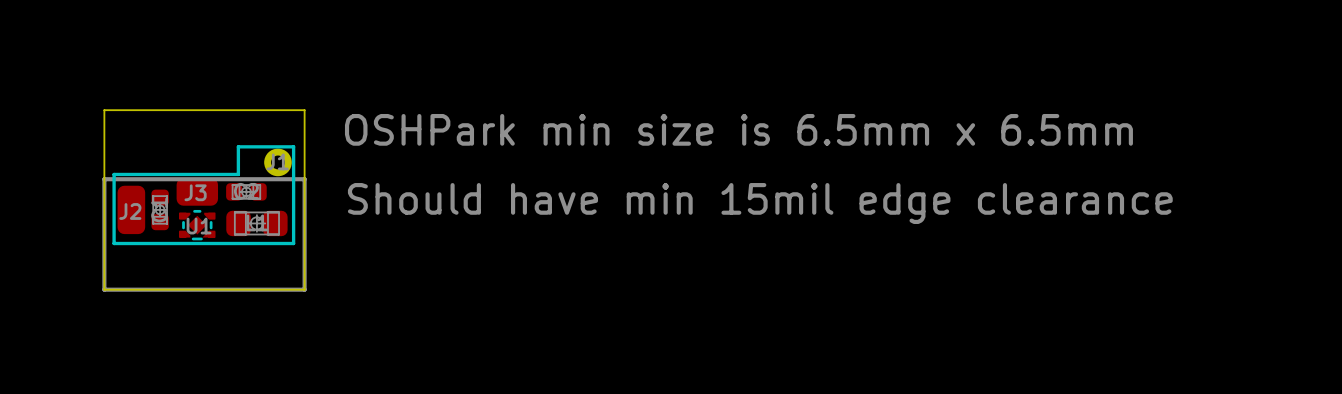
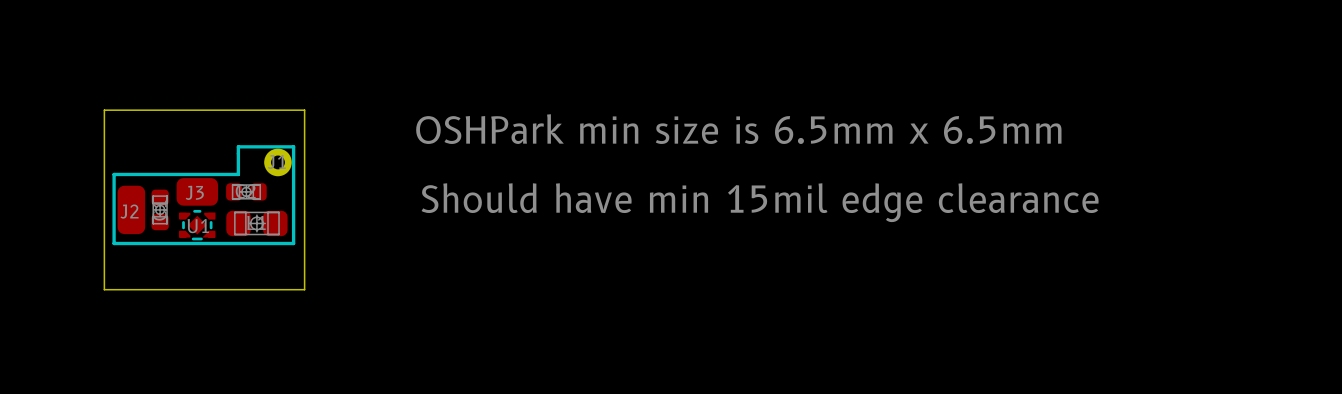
line: (104, 179) (104, 289) (304, 289) (304, 179) (104, 179) -> none

